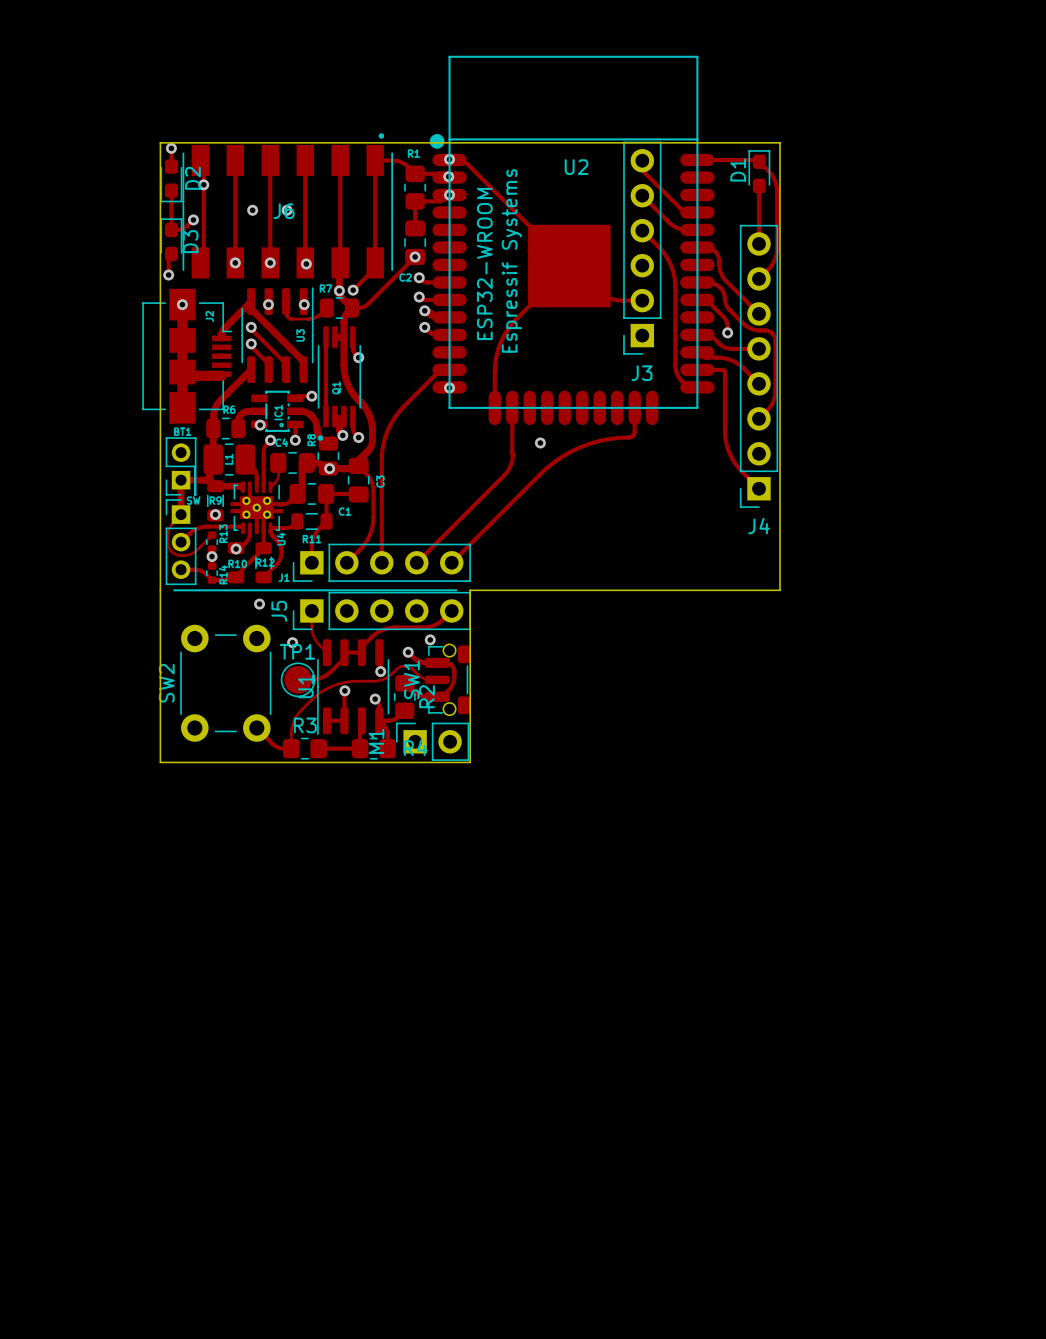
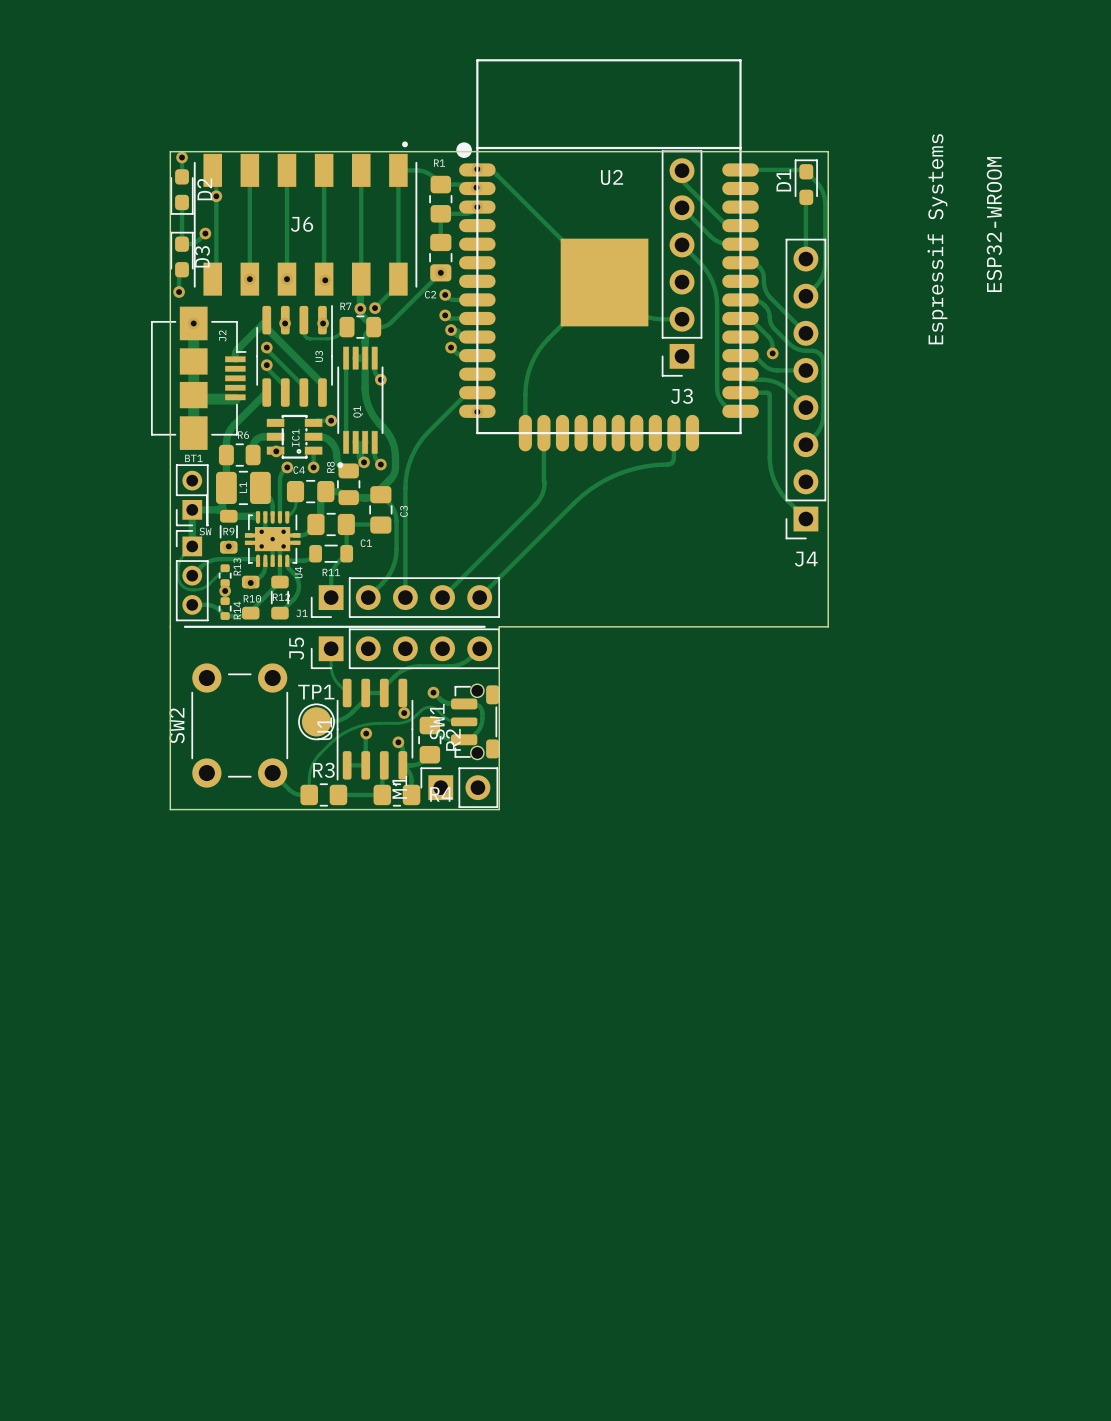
via: (252, 210) -> none
via: (287, 210) -> none
U2 text position: Espressif Systems (511, 260) -> Espressif Systems (937, 239)
U2 text position: ESP32-WROOM (484, 264) -> ESP32-WROOM (994, 224)
via: (540, 443) -> none
via: (329, 468) -> none
via: (259, 604) -> none
via: (430, 639) -> none
via: (292, 642) -> none

